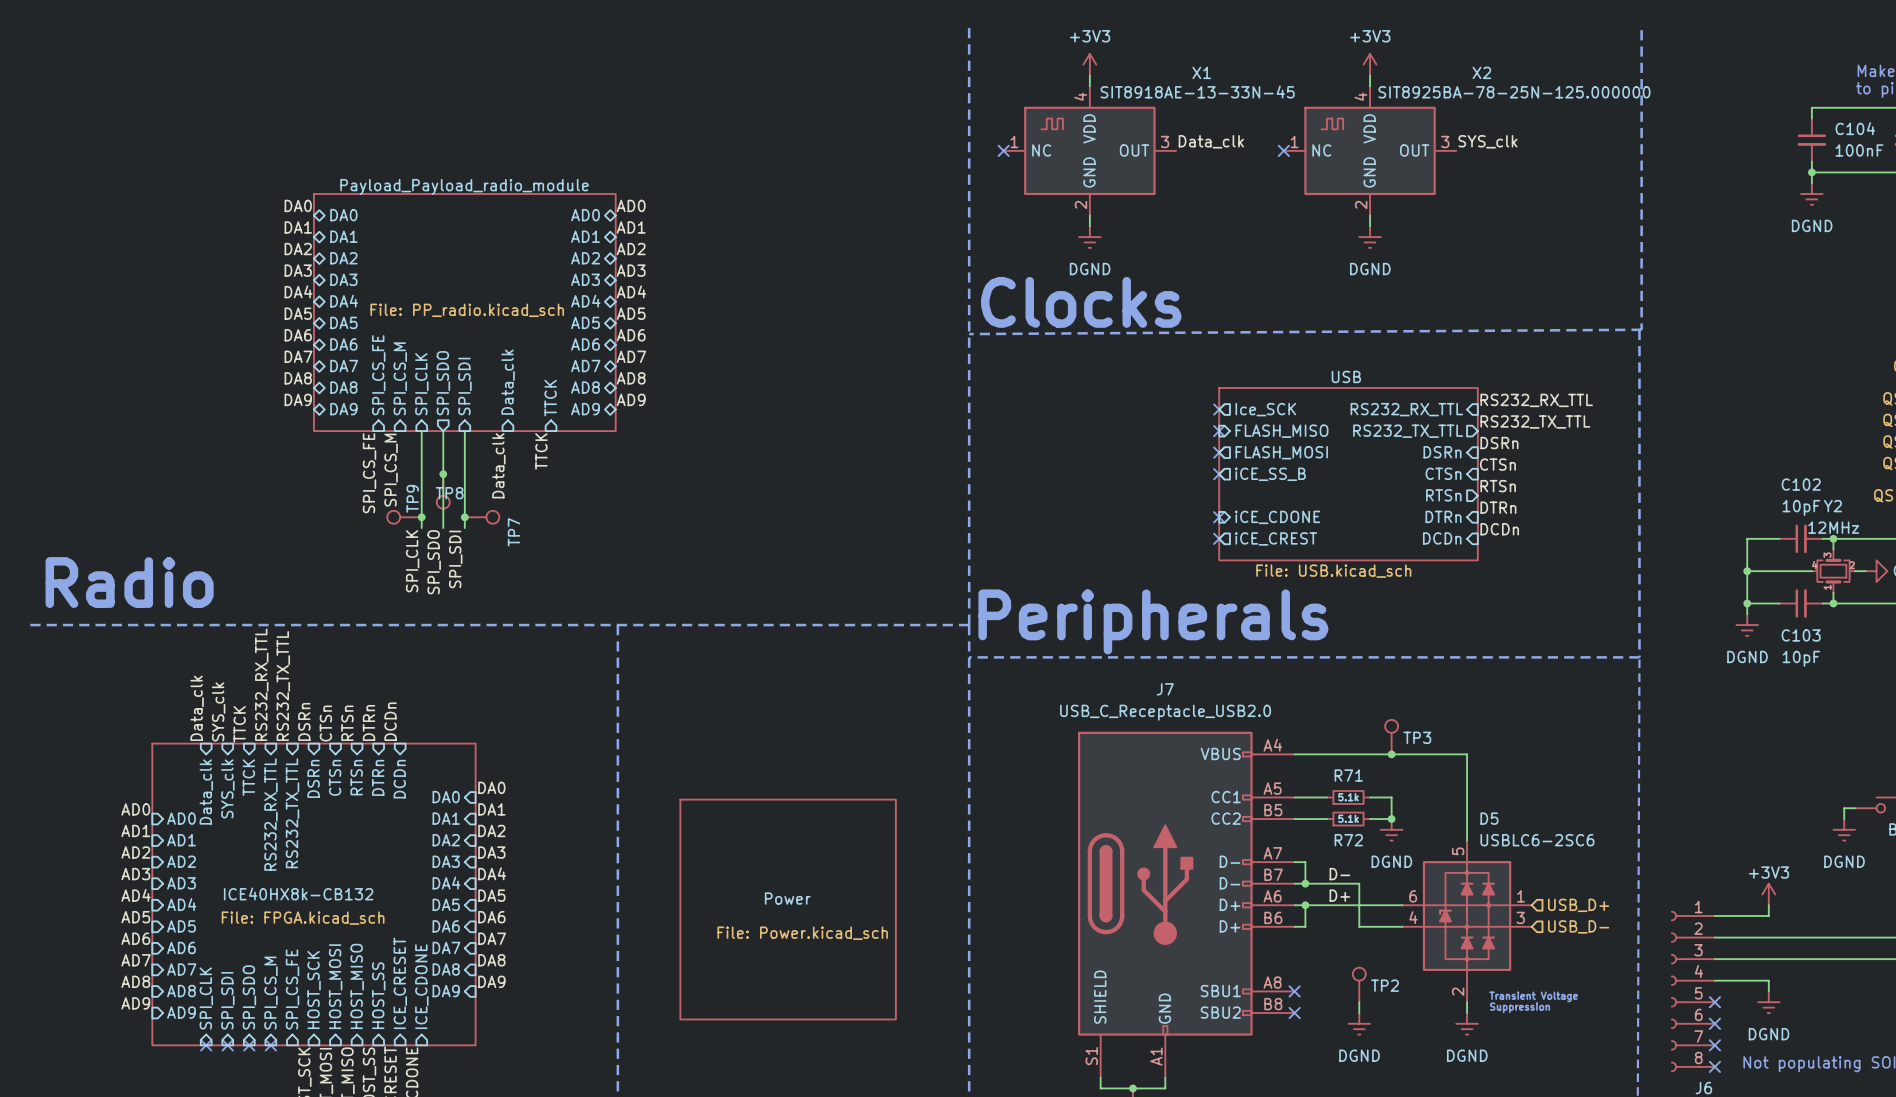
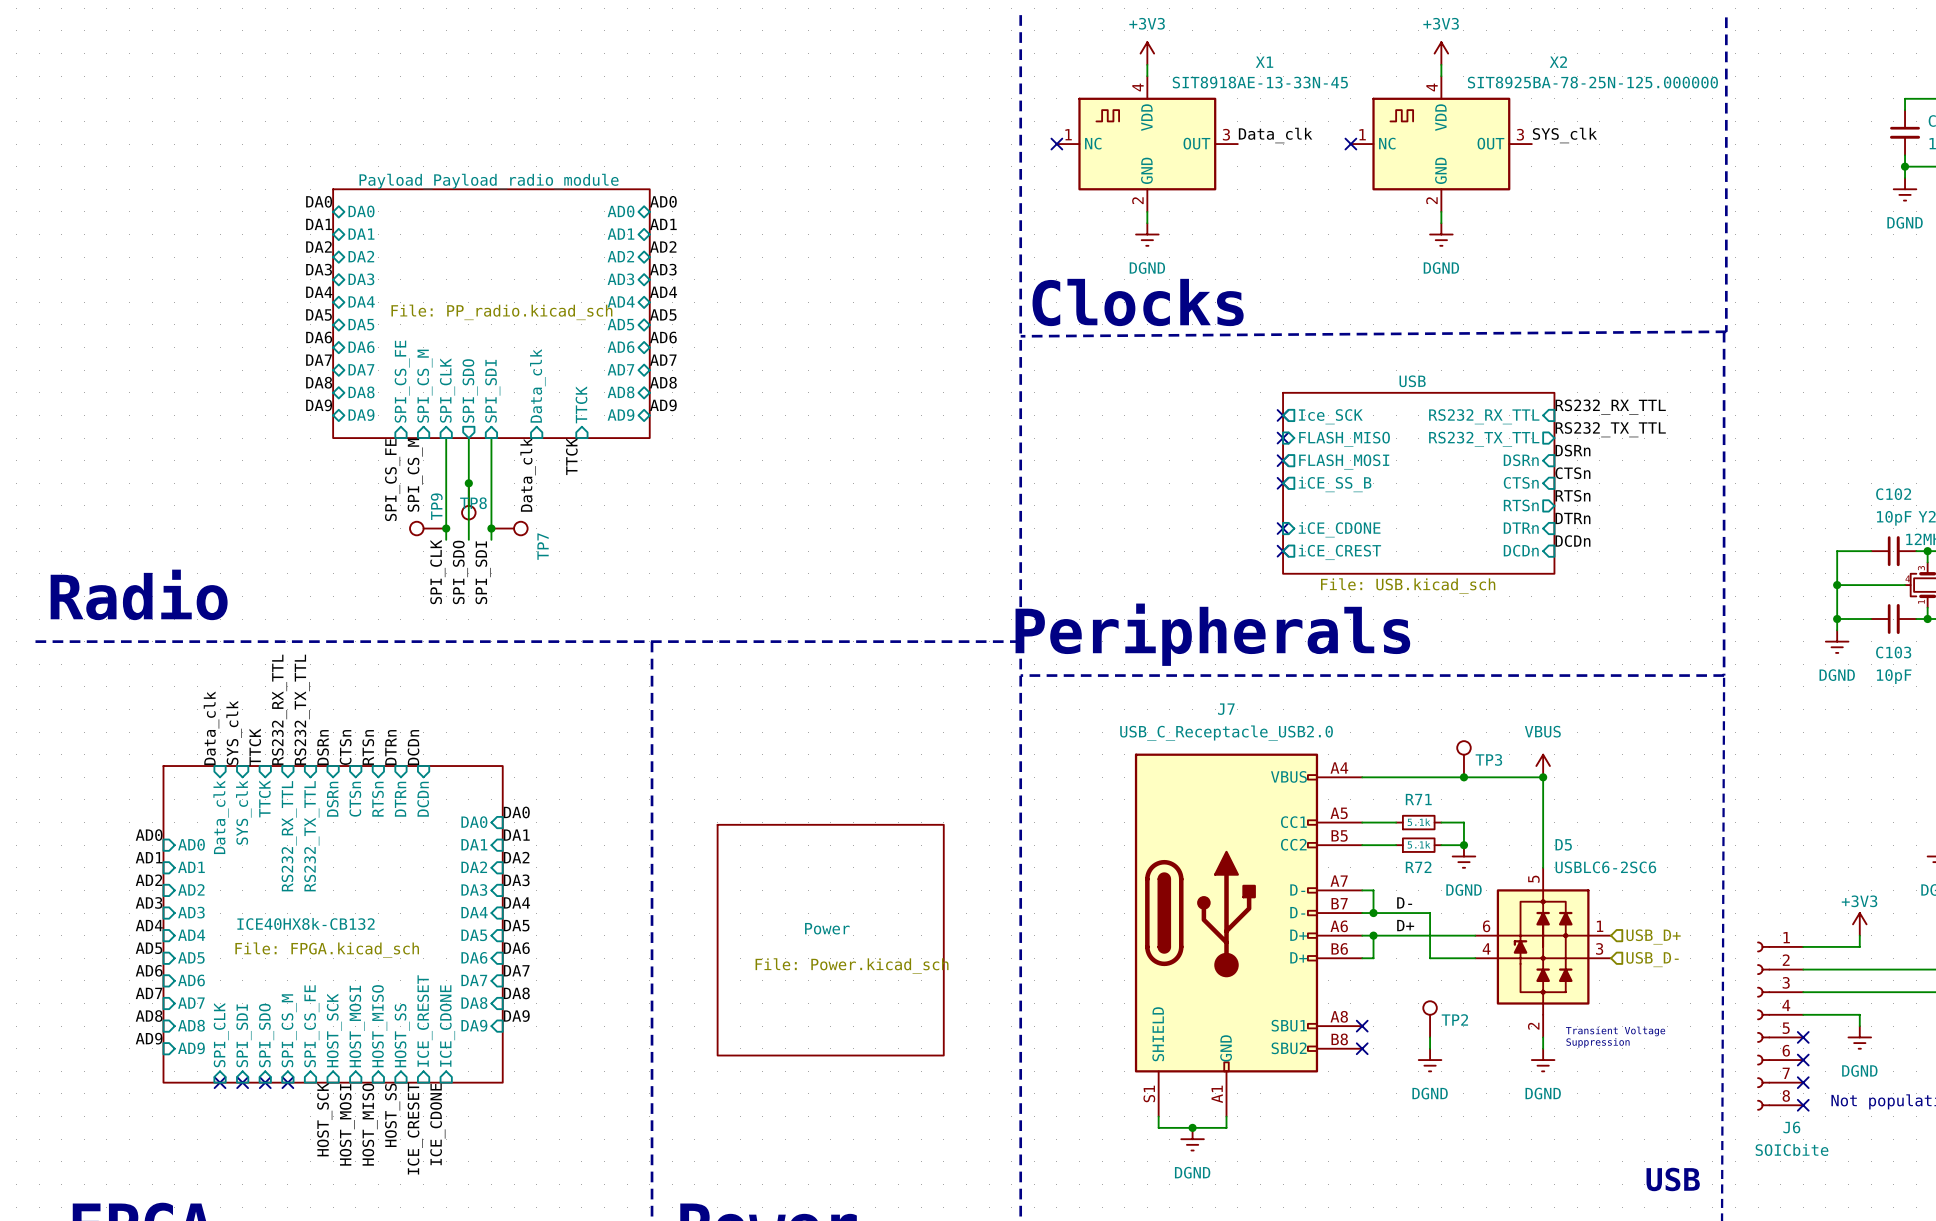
power symbol: none -> VBUS (1543, 766)
junction: none -> (1543, 777)

